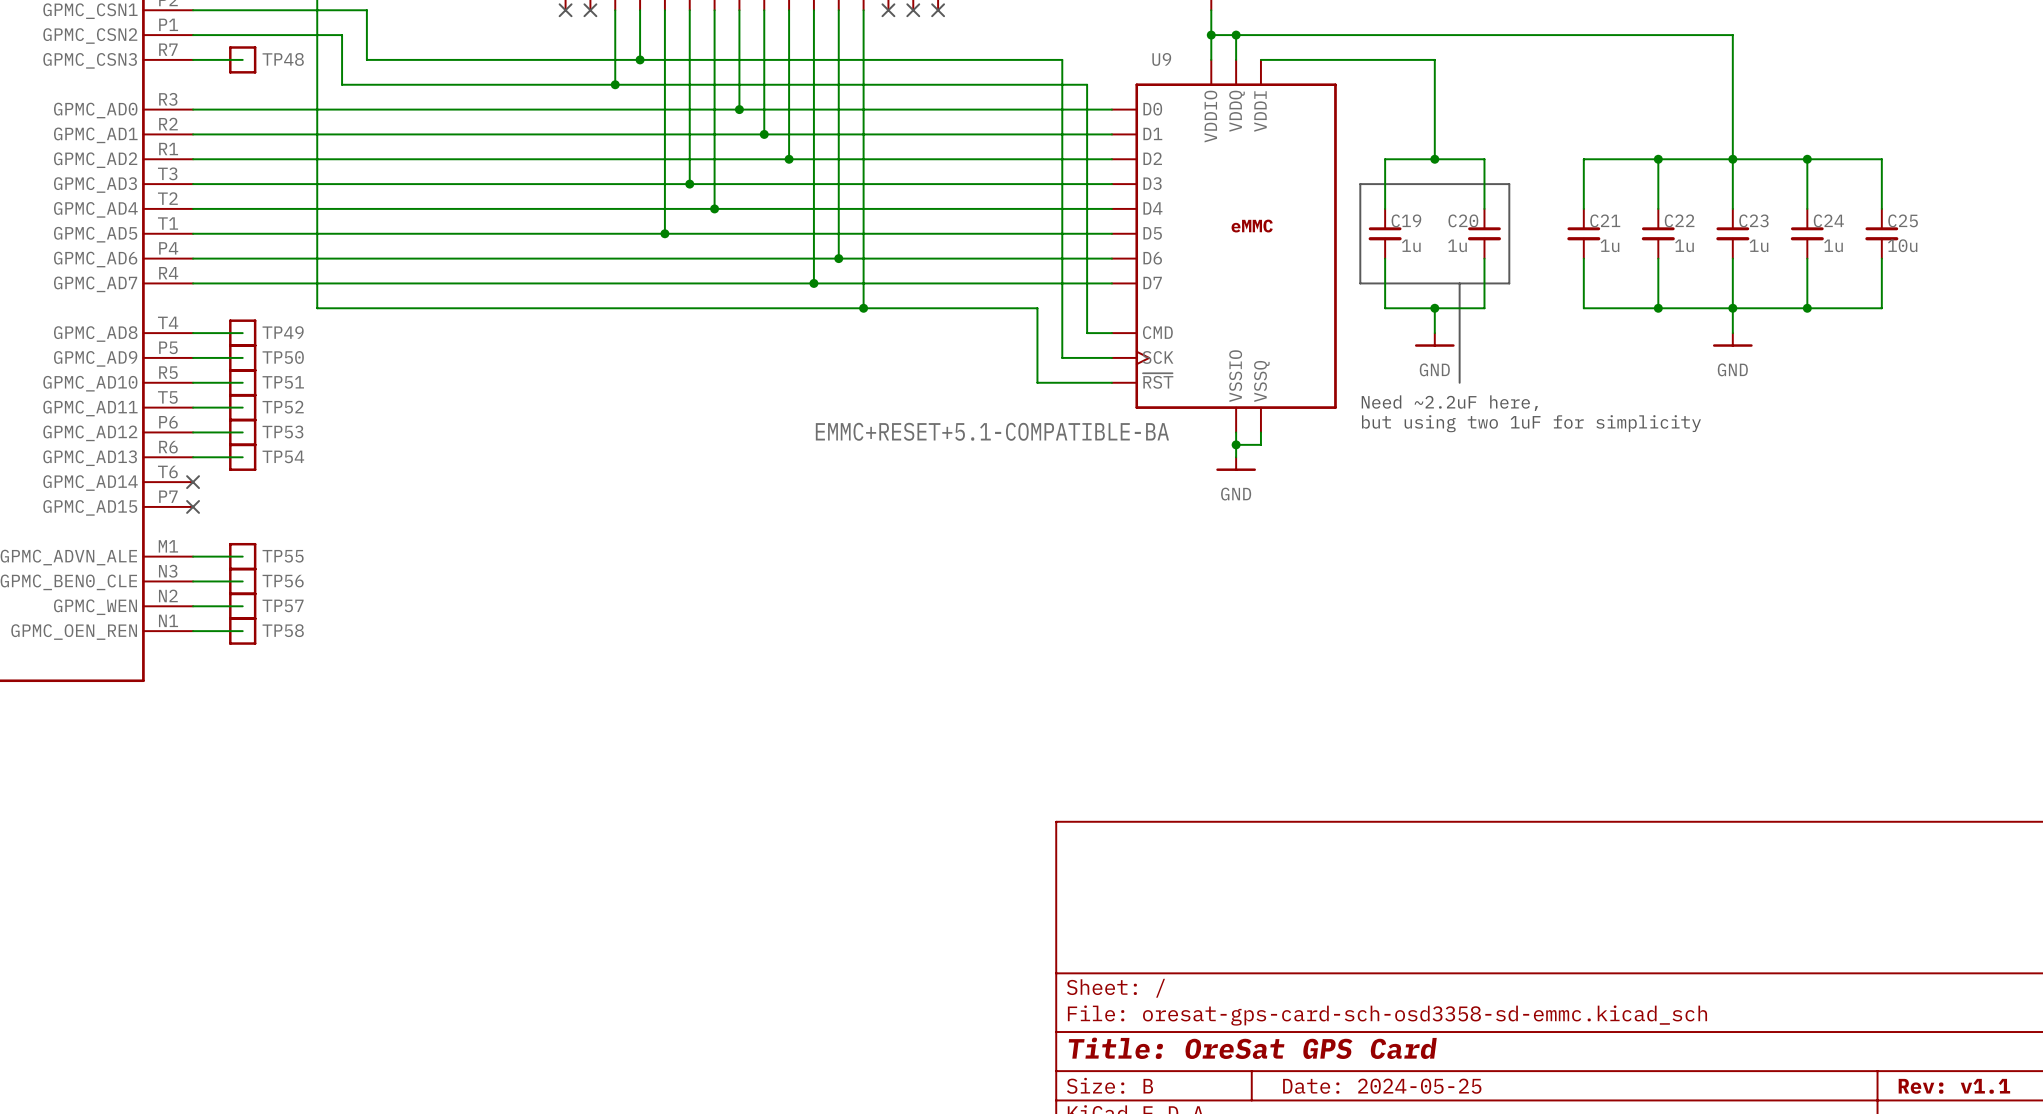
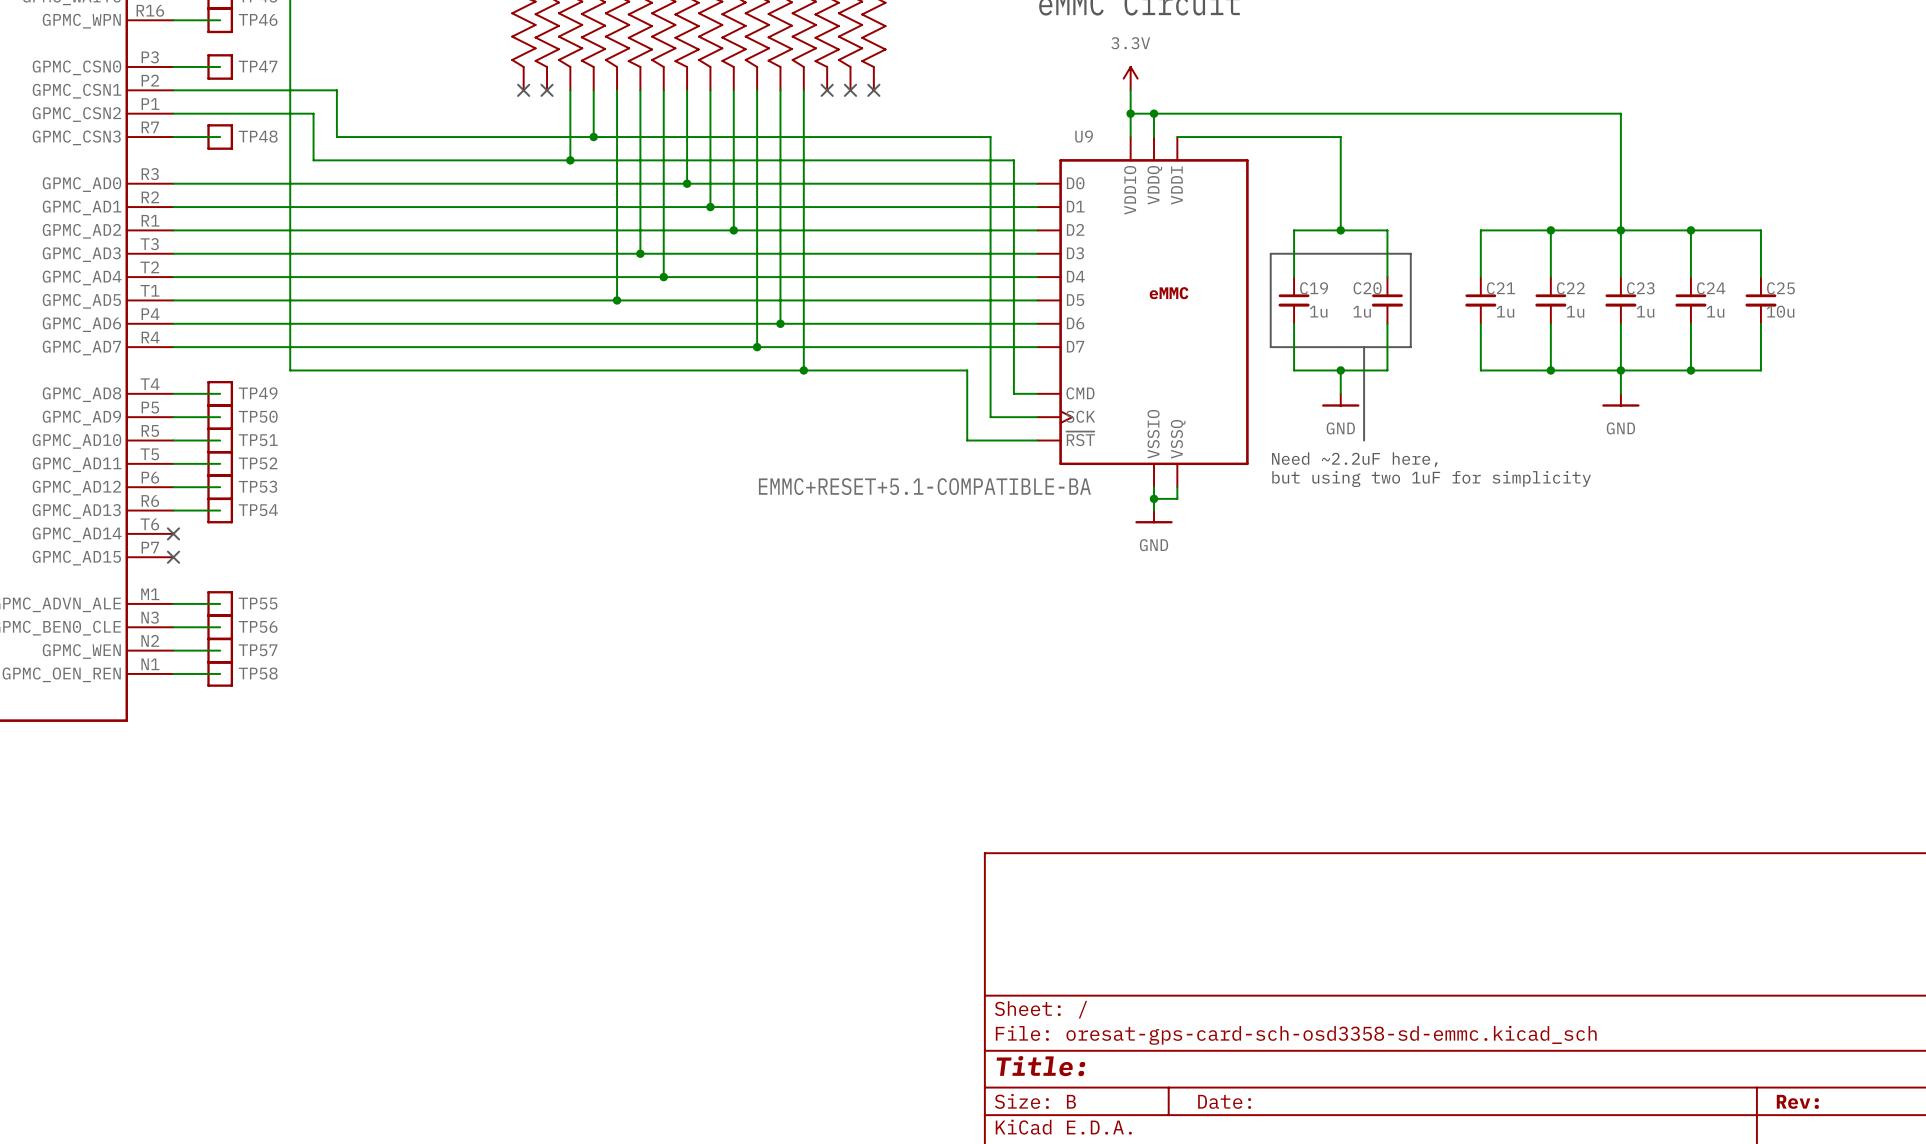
title block: Title: OreSat GPS Card (1252, 1048) -> Title: (1040, 1066)
title block: Date: 2024-05-25 (1382, 1086) -> Date: (1224, 1101)
title block: Rev: v1.1 (1954, 1086) -> Rev: (1797, 1101)

